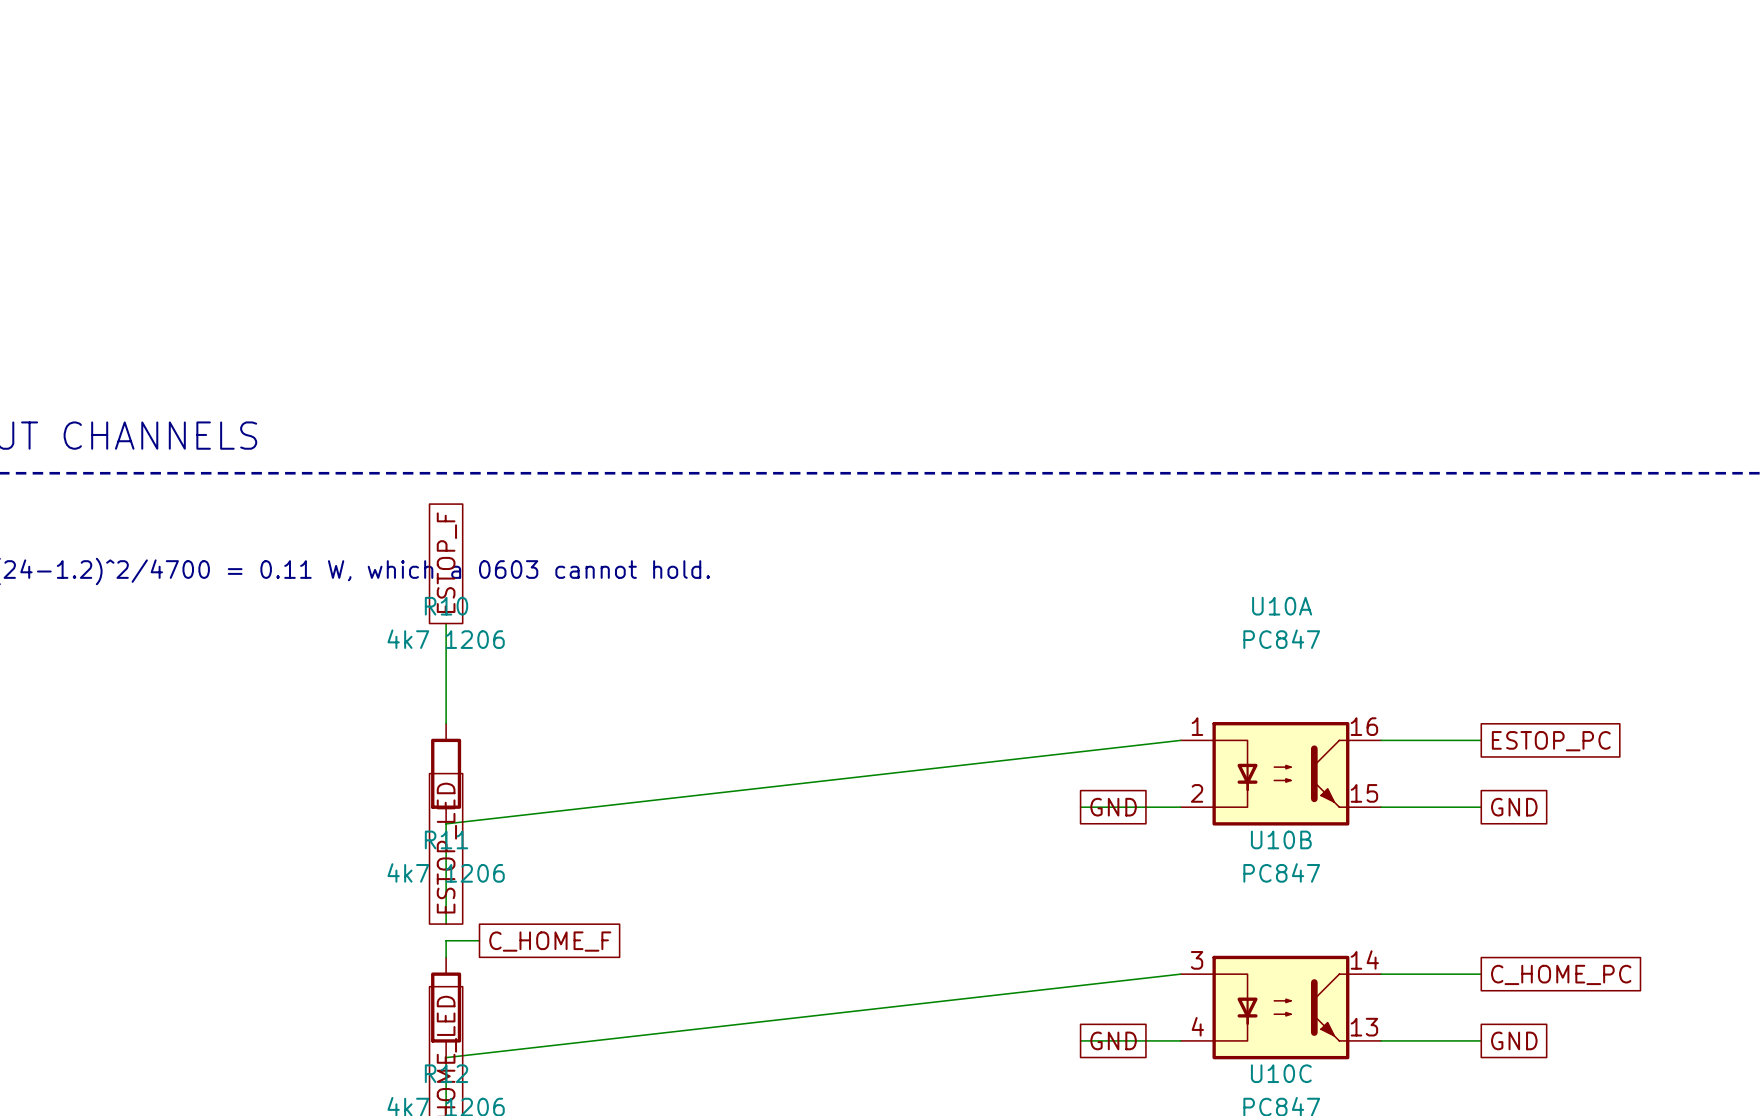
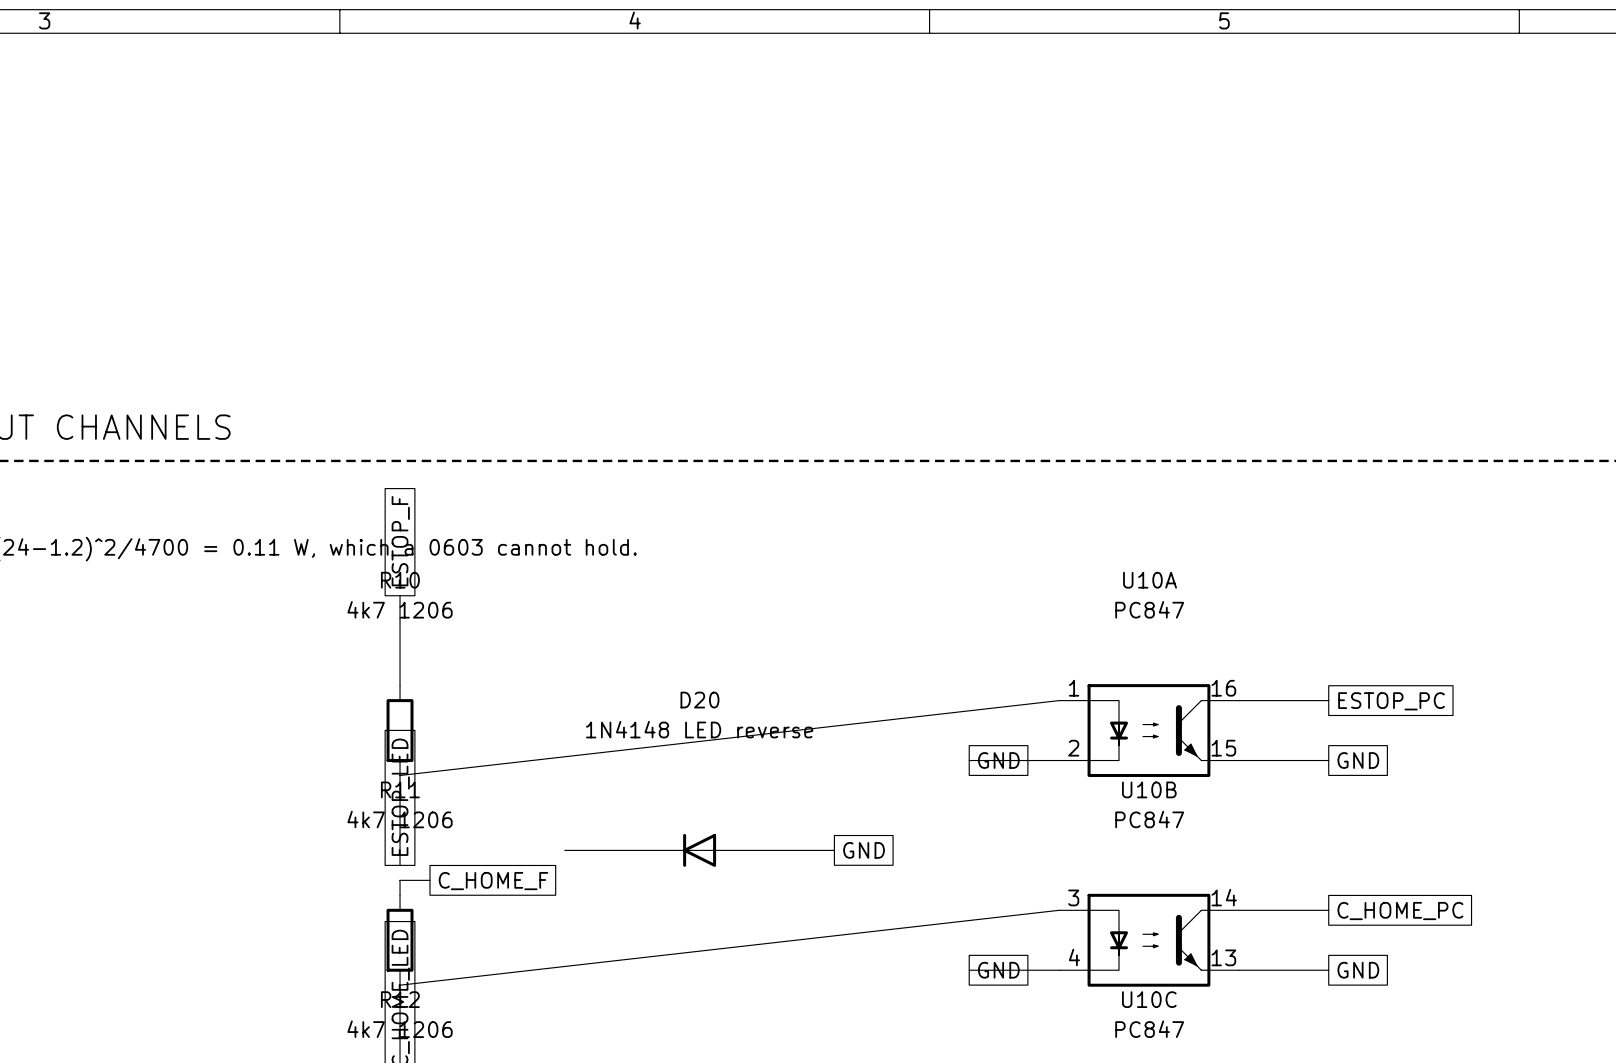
wire: none -> (564, 850) (654, 850)
D20: none -> 1N4148 LED reverse (699, 850)
wire: none -> (744, 850) (834, 850)
global label: none -> GND (864, 850)

